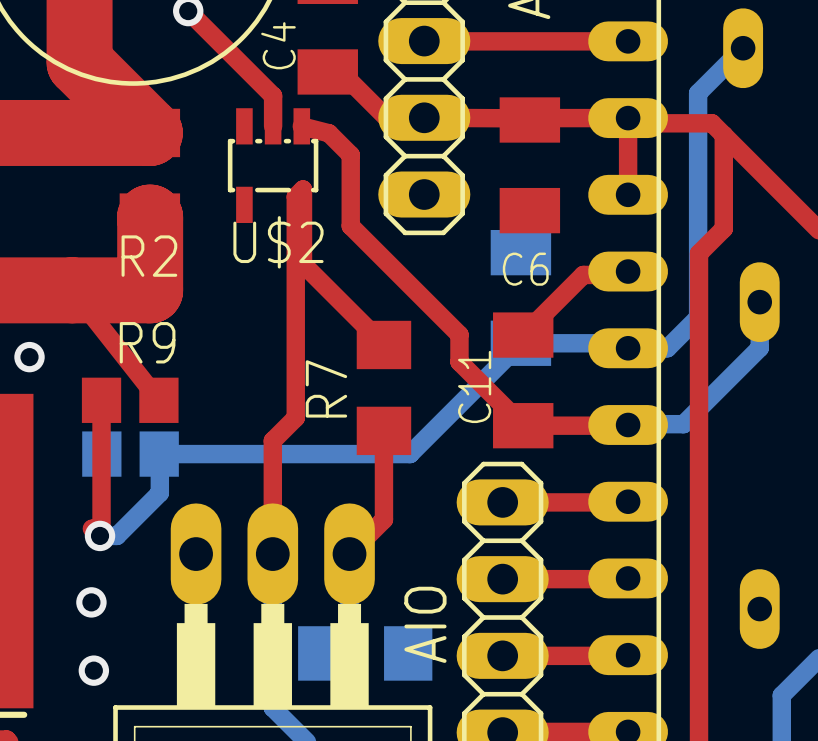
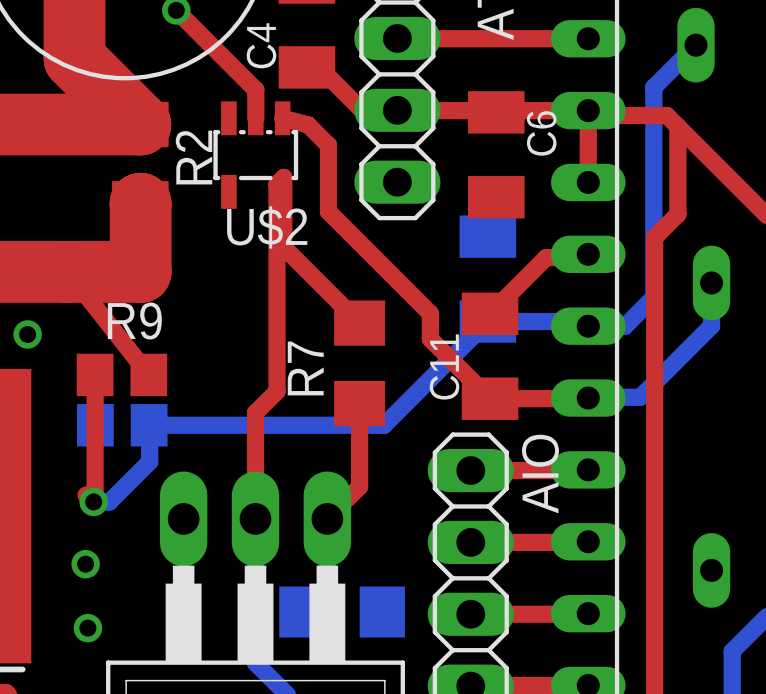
R2 name rotation: 0° (149, 256) -> 90° counterclockwise (193, 157)
R2 name position: R2 (149, 256) -> R2 (193, 157)
C6 name rotation: 0° (525, 269) -> 90° counterclockwise (541, 133)
C6 name position: C6 (525, 269) -> C6 (541, 133)
AIO name position: AIO (425, 624) -> AIO (540, 474)

